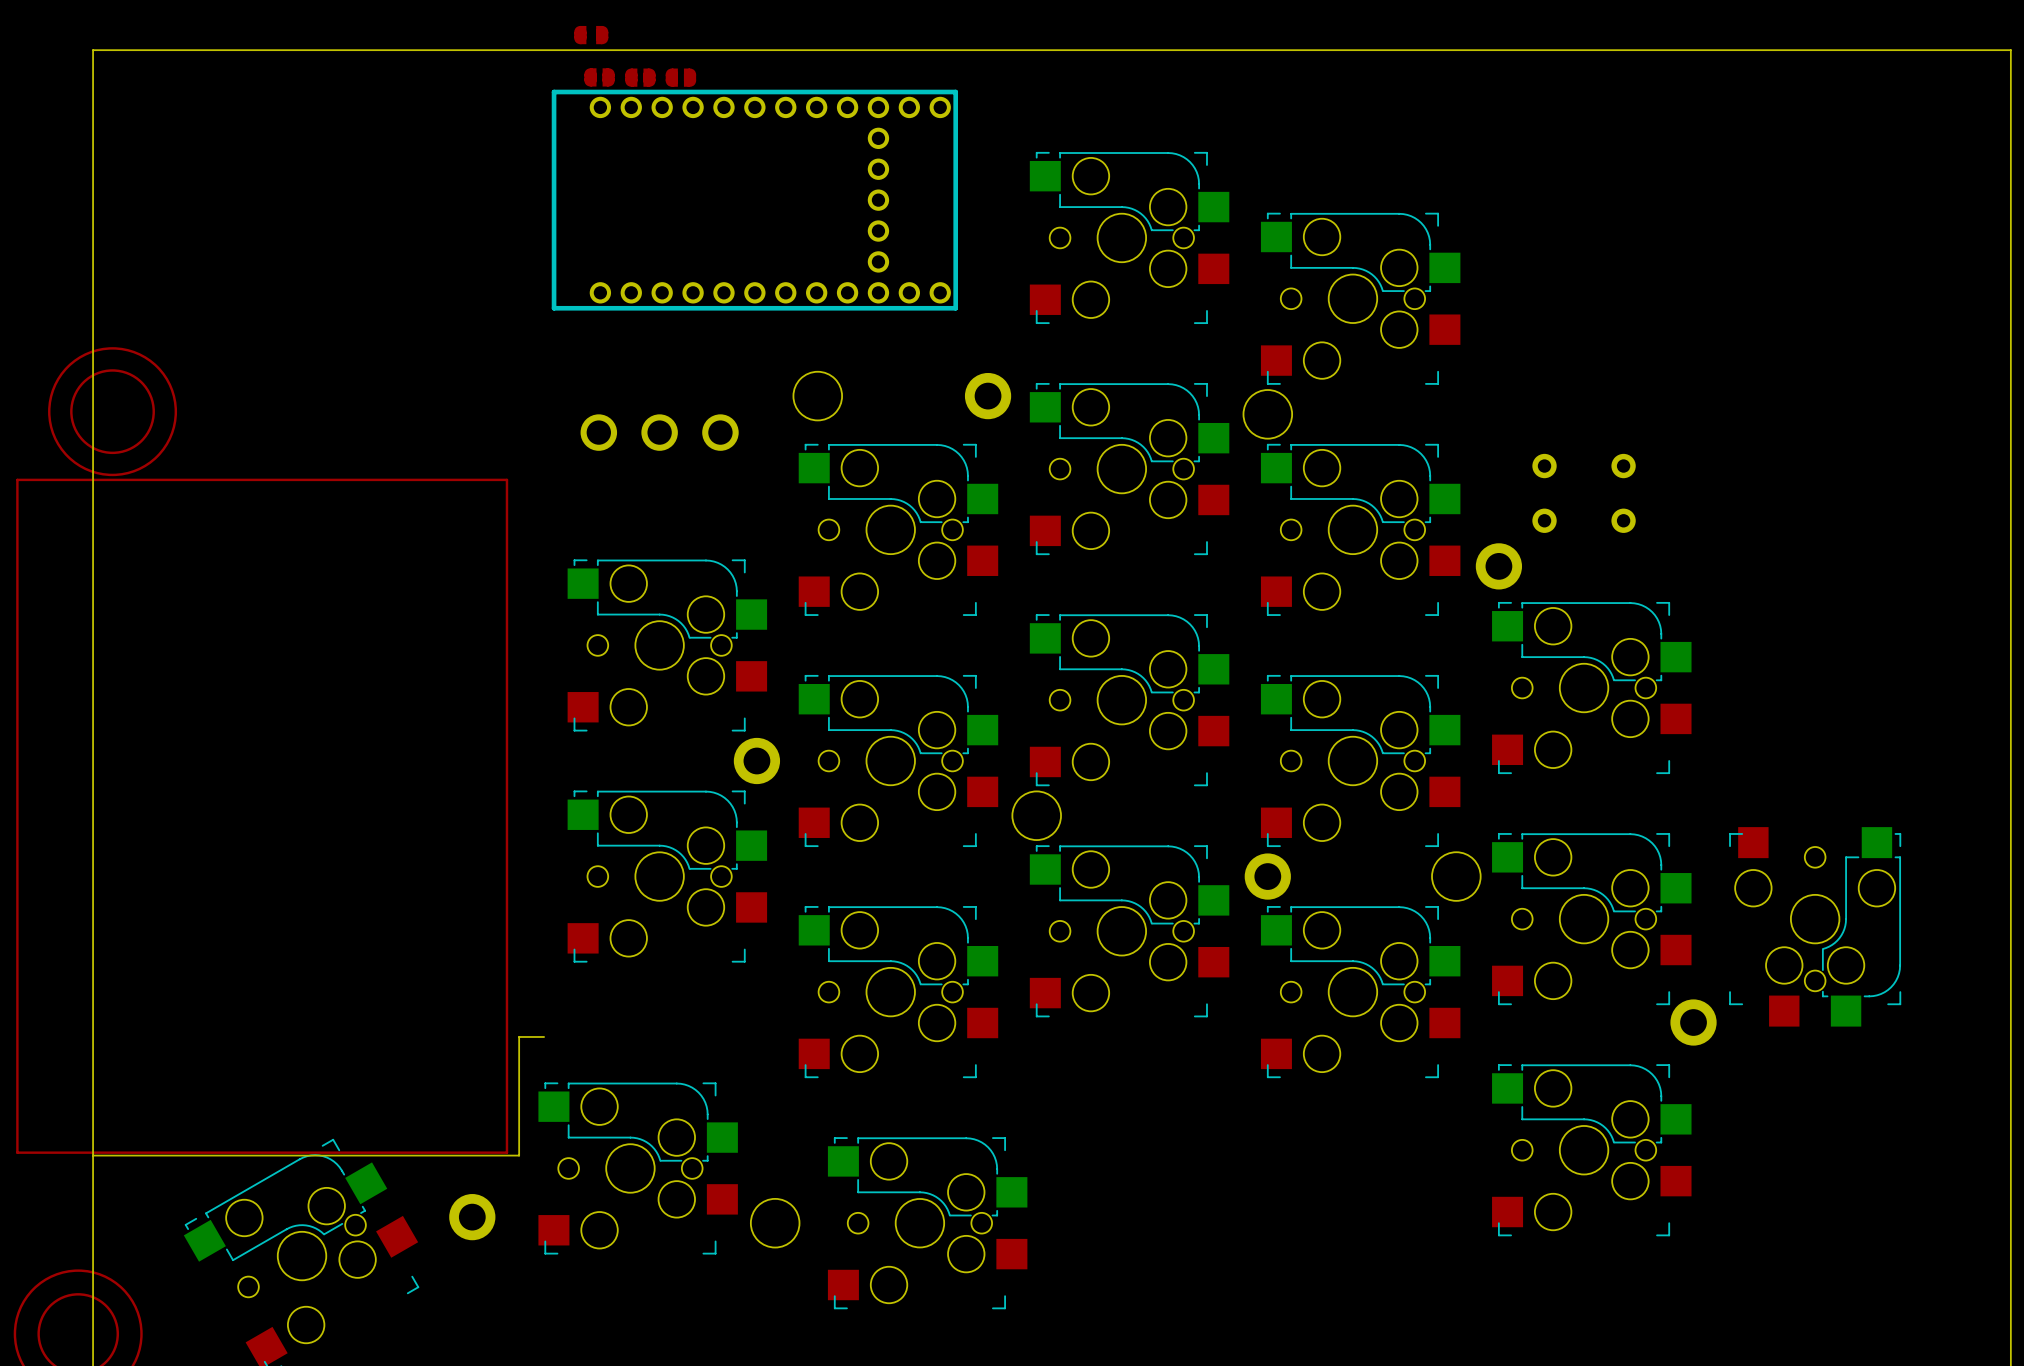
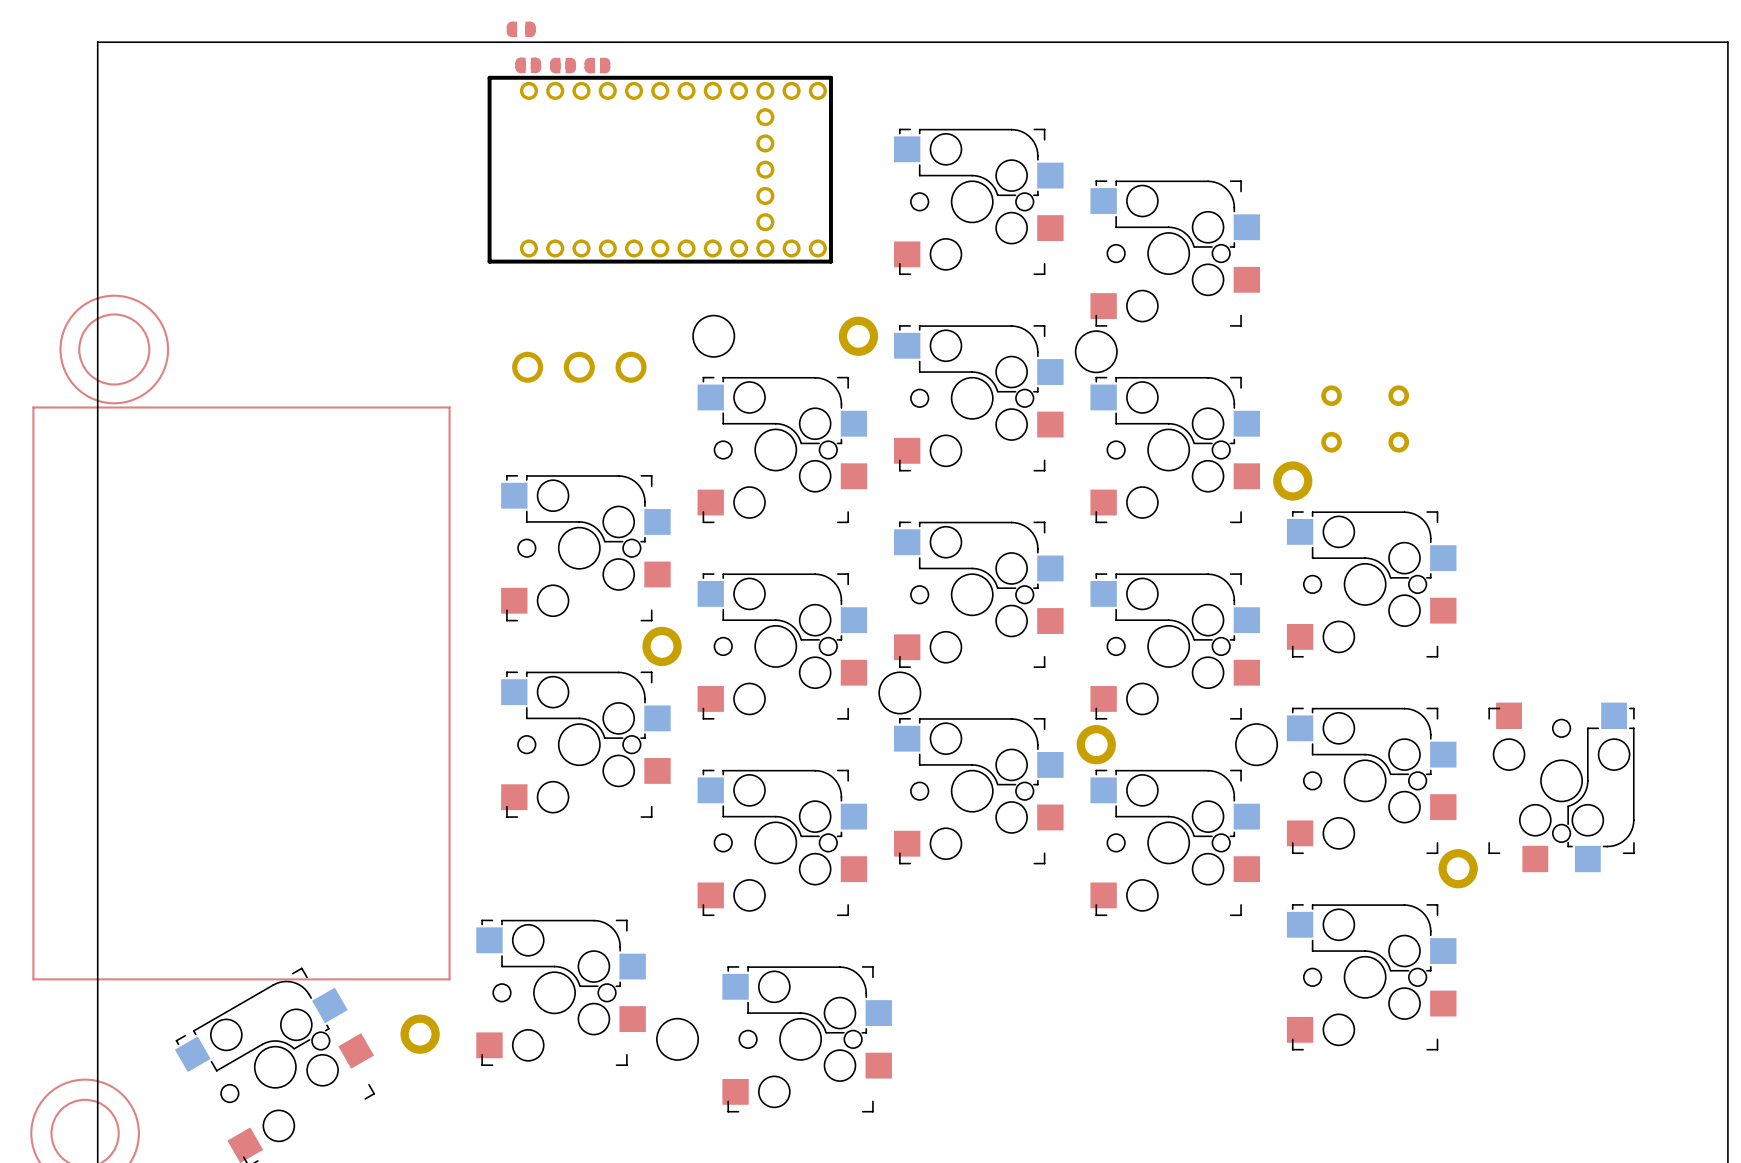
board edge: (544, 1036) (519, 1036) (519, 1155) (93, 1155) -> none

